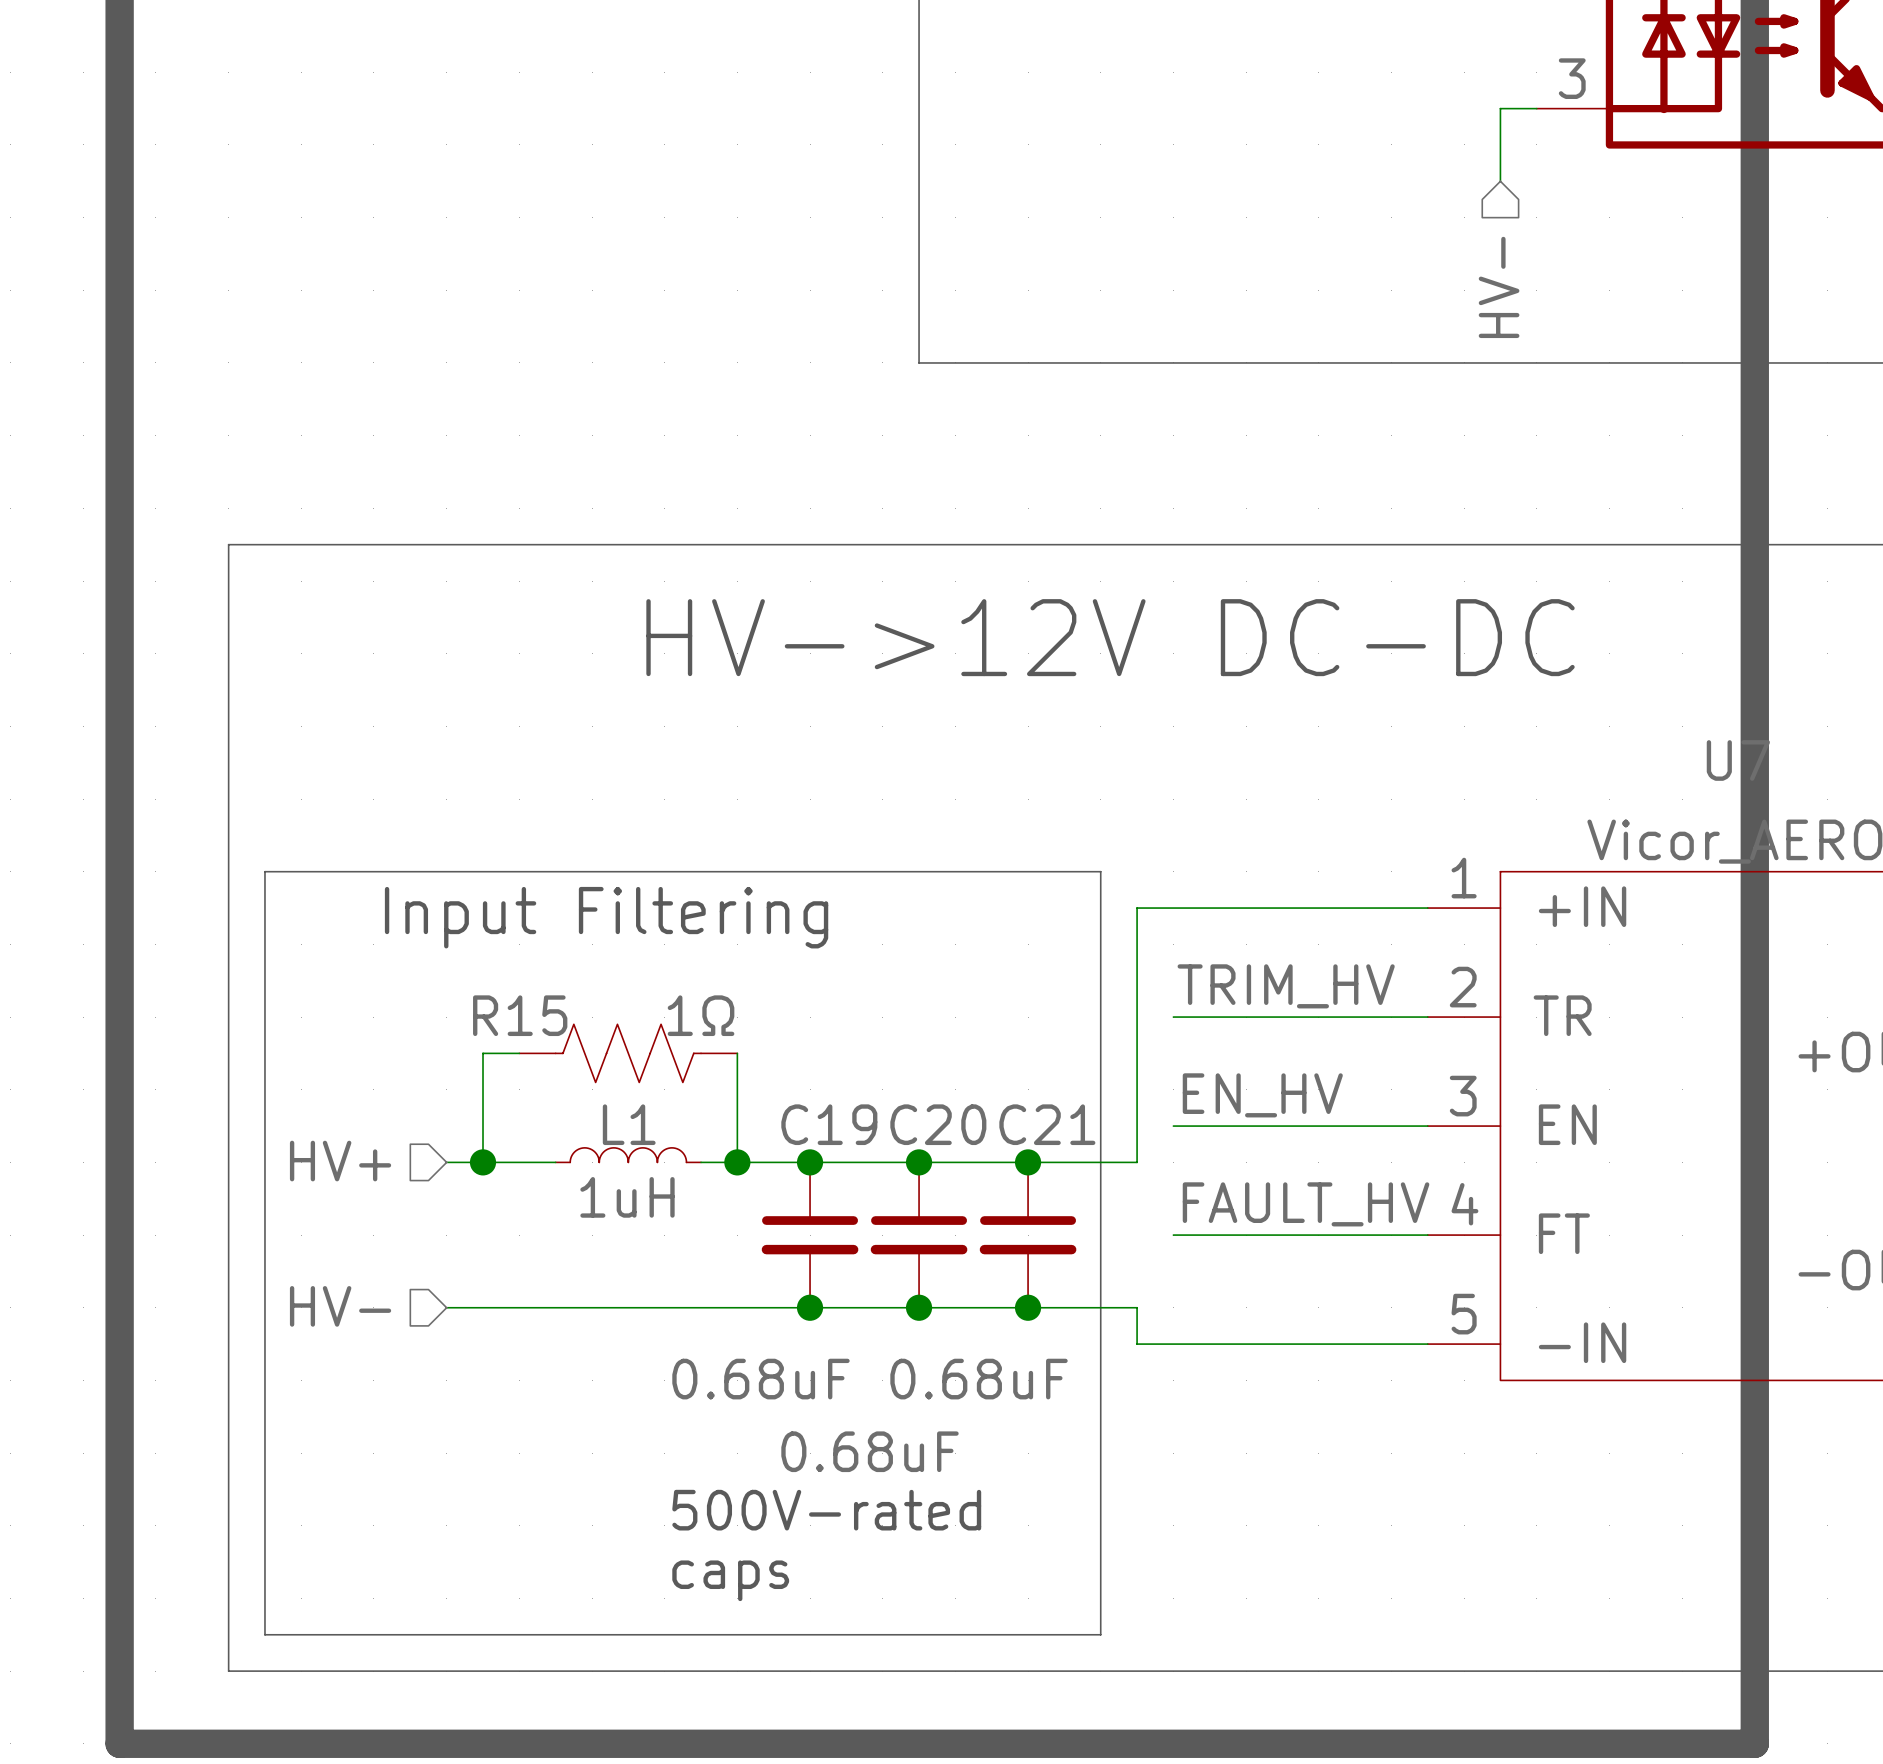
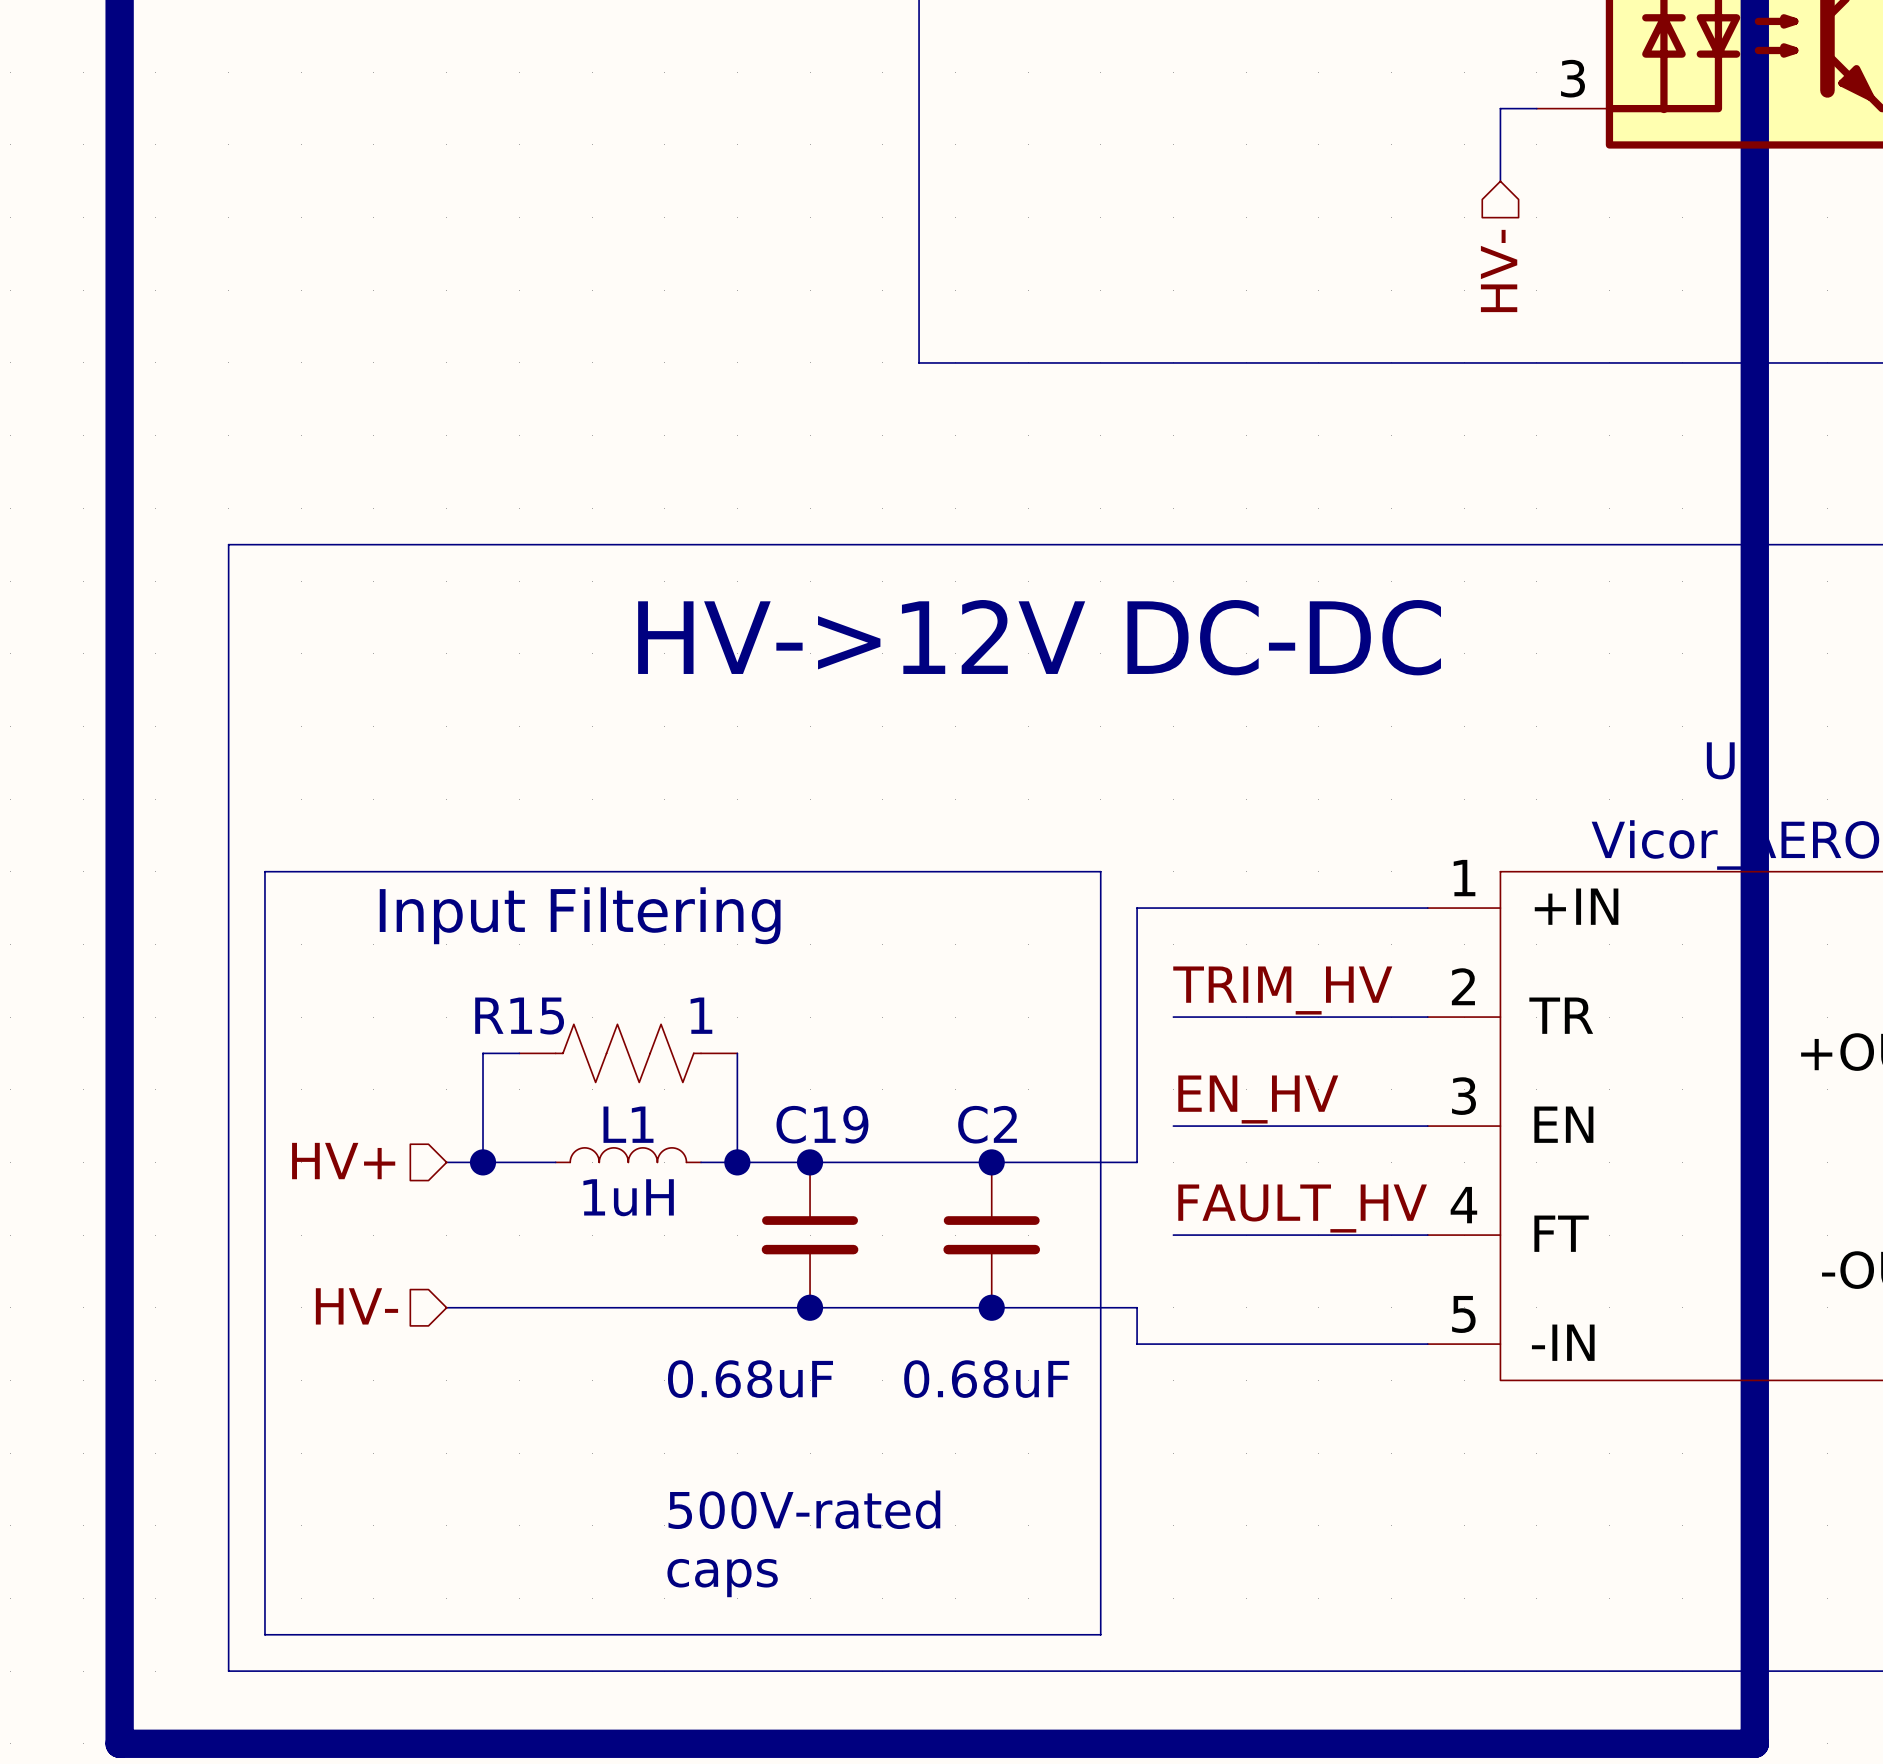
R15 value: 1Ω (701, 1015) -> 1 (701, 1015)
junction: (919, 1162) -> none
junction: none -> (991, 1162)
junction: (1028, 1162) -> none
C20: 0.68uF (919, 1235) -> none
C2: none -> 0.68uF (991, 1235)
C21: 0.68uF (1028, 1235) -> none
junction: (919, 1307) -> none
junction: none -> (991, 1307)
junction: (1028, 1307) -> none

